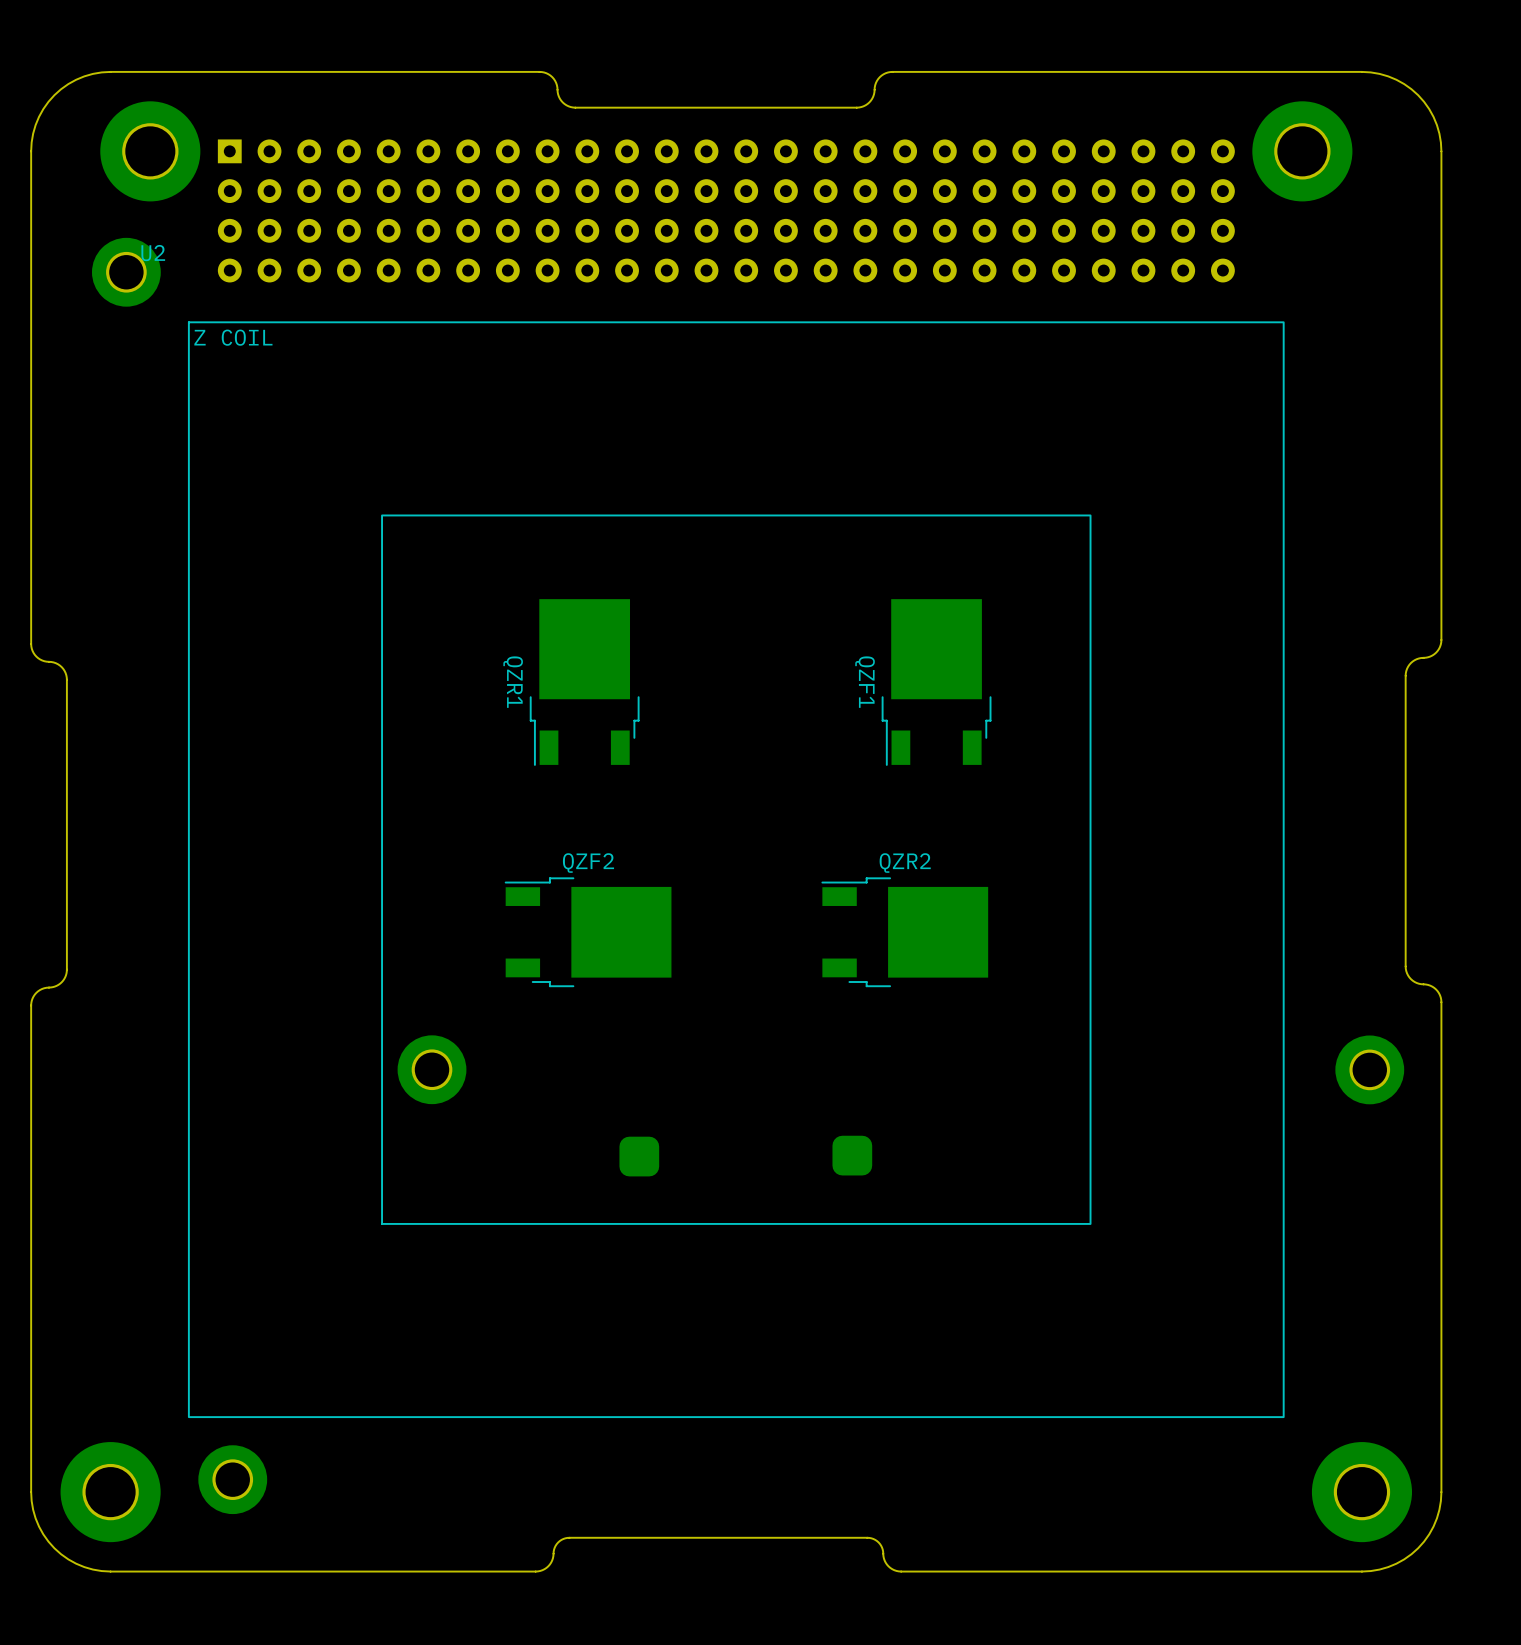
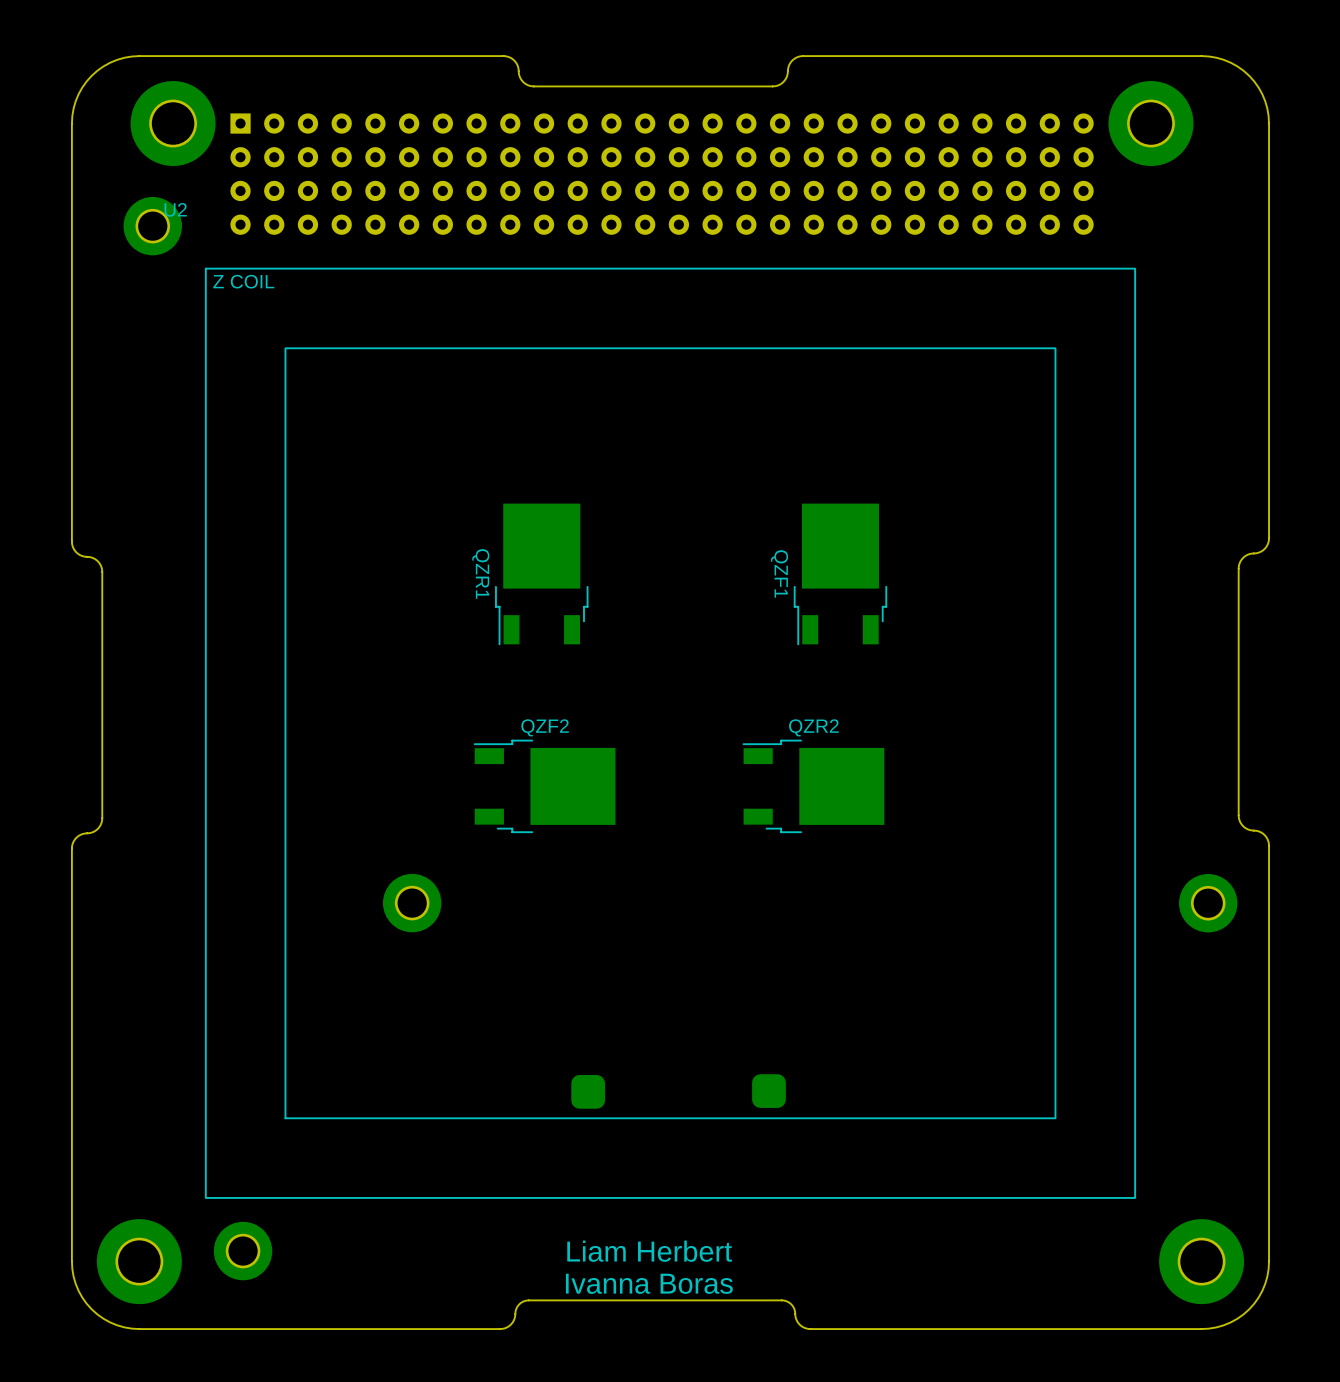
U2 footprint: [187, 321, 1285, 1419] -> [205, 267, 1136, 1199]
text: none -> Liam Herbert (649, 1251)
text: none -> Ivanna Boras (649, 1283)

